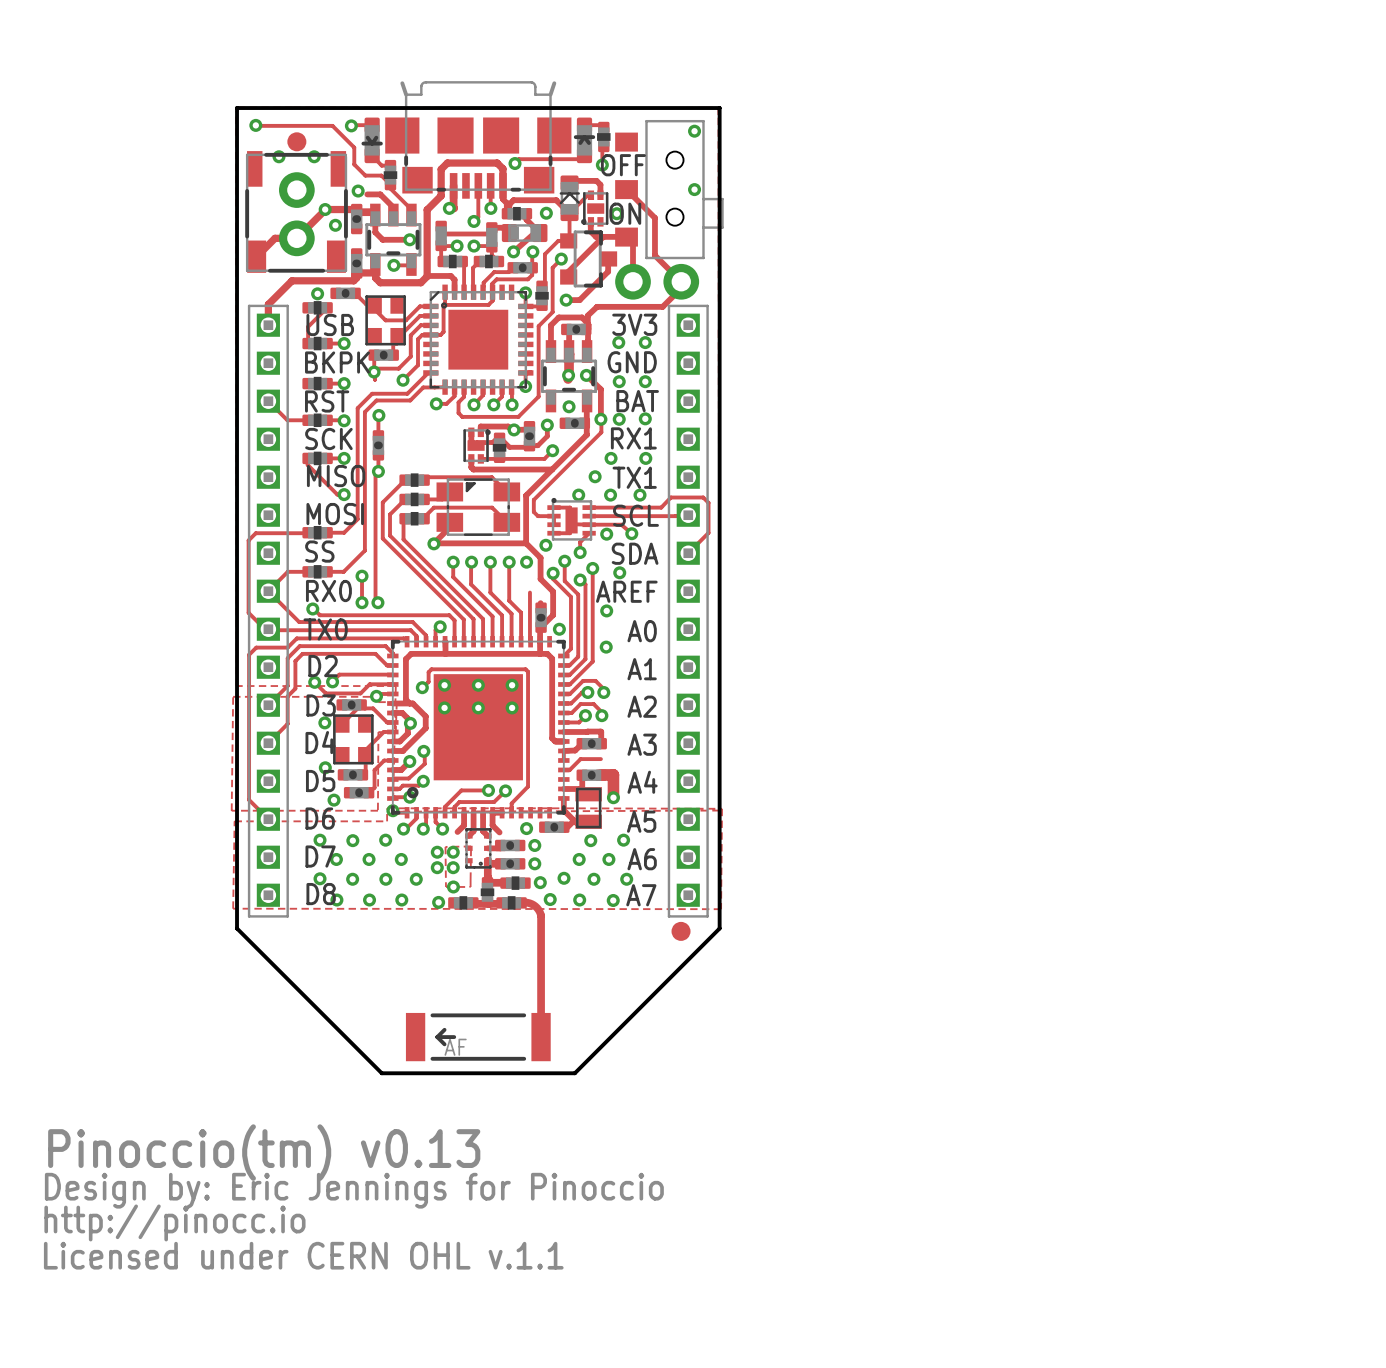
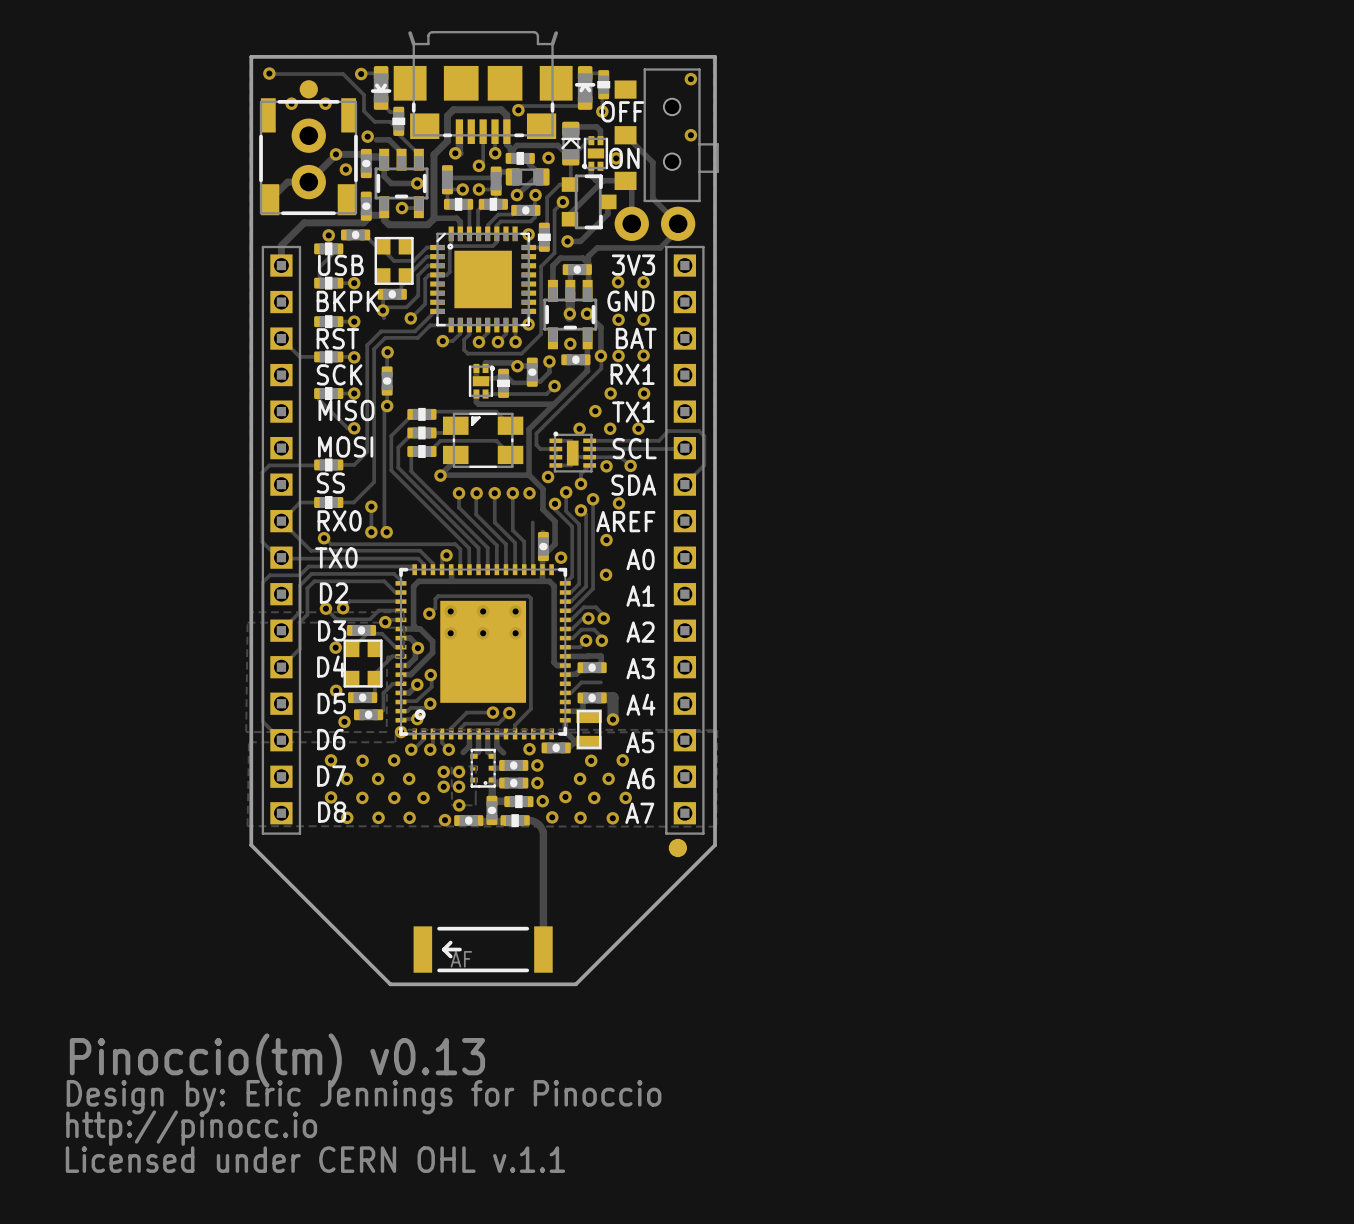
part footprint: [480, 877, 495, 908] -> [486, 795, 498, 826]
part footprint: [448, 896, 479, 910] -> [454, 815, 484, 827]

